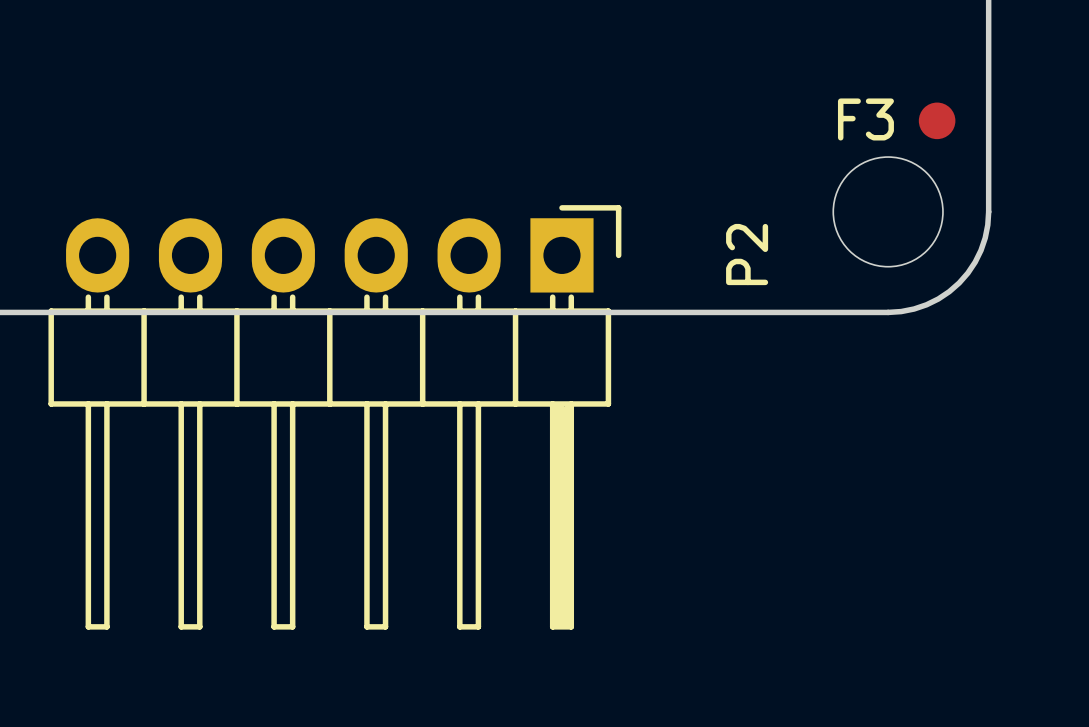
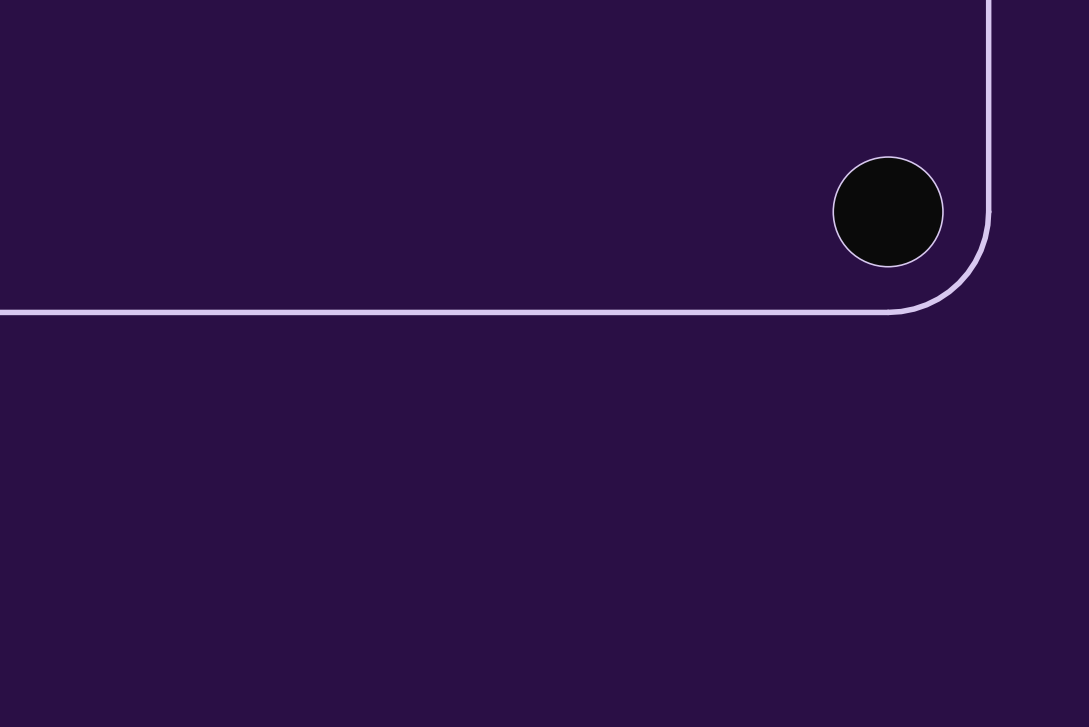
F3: (937, 120) -> none
P2: (334, 417) -> none

